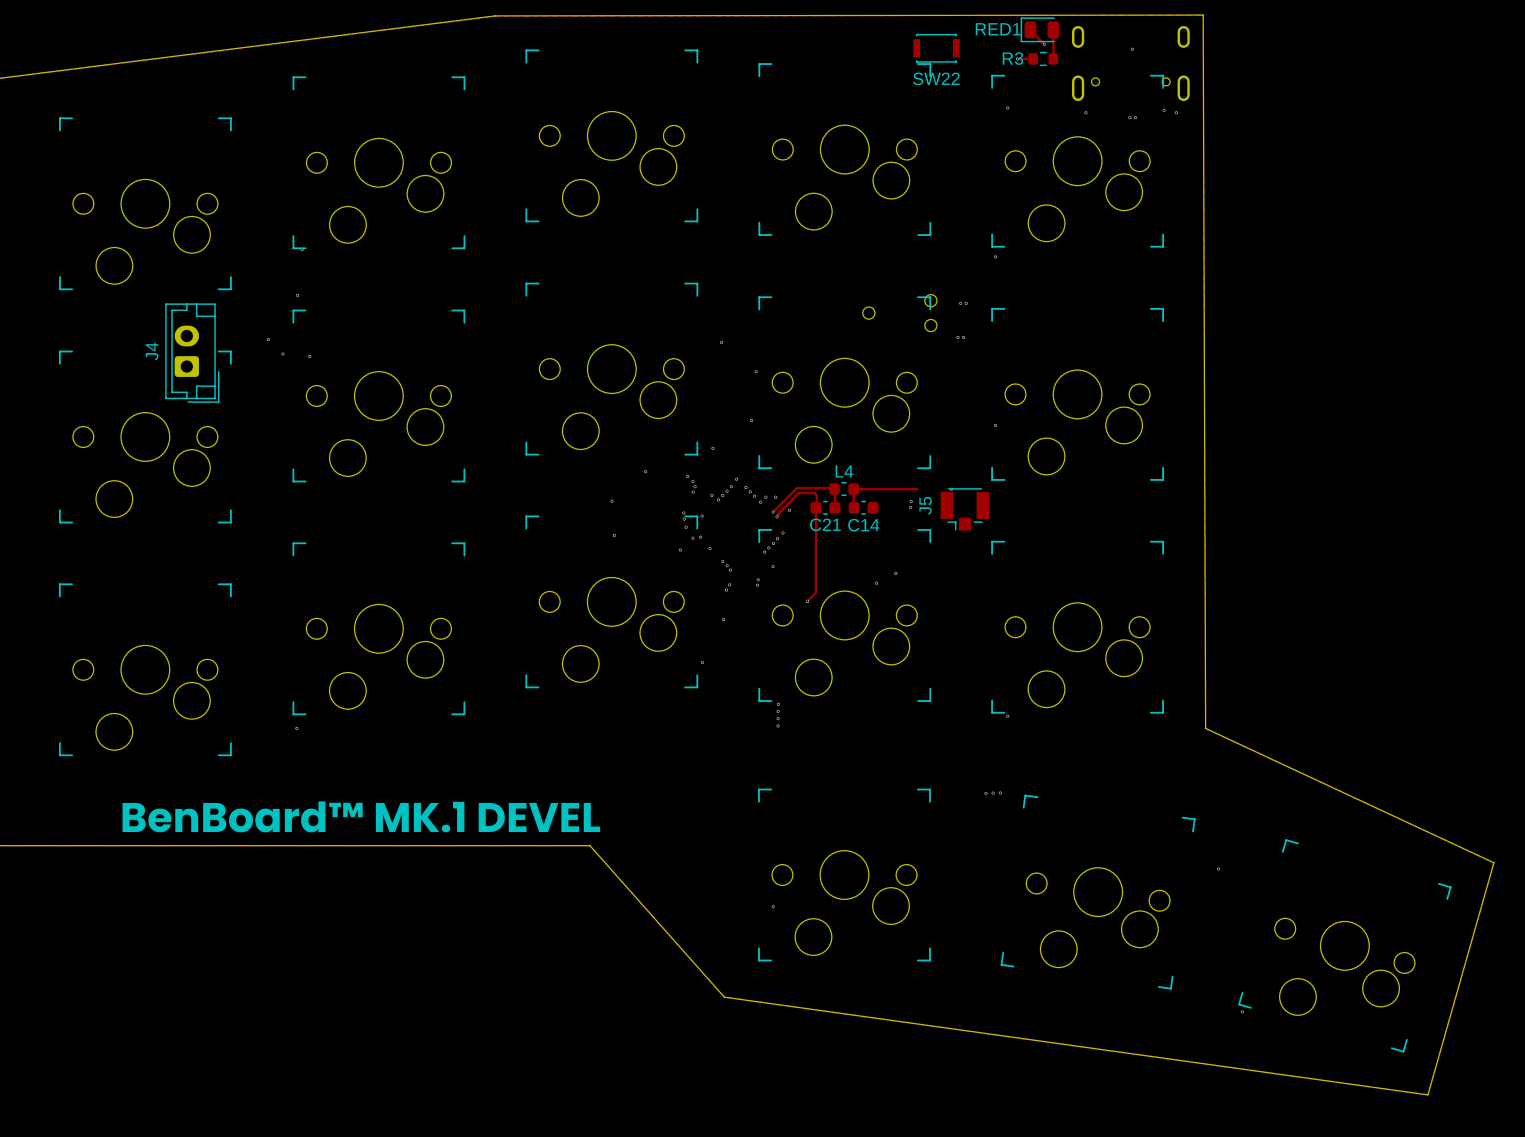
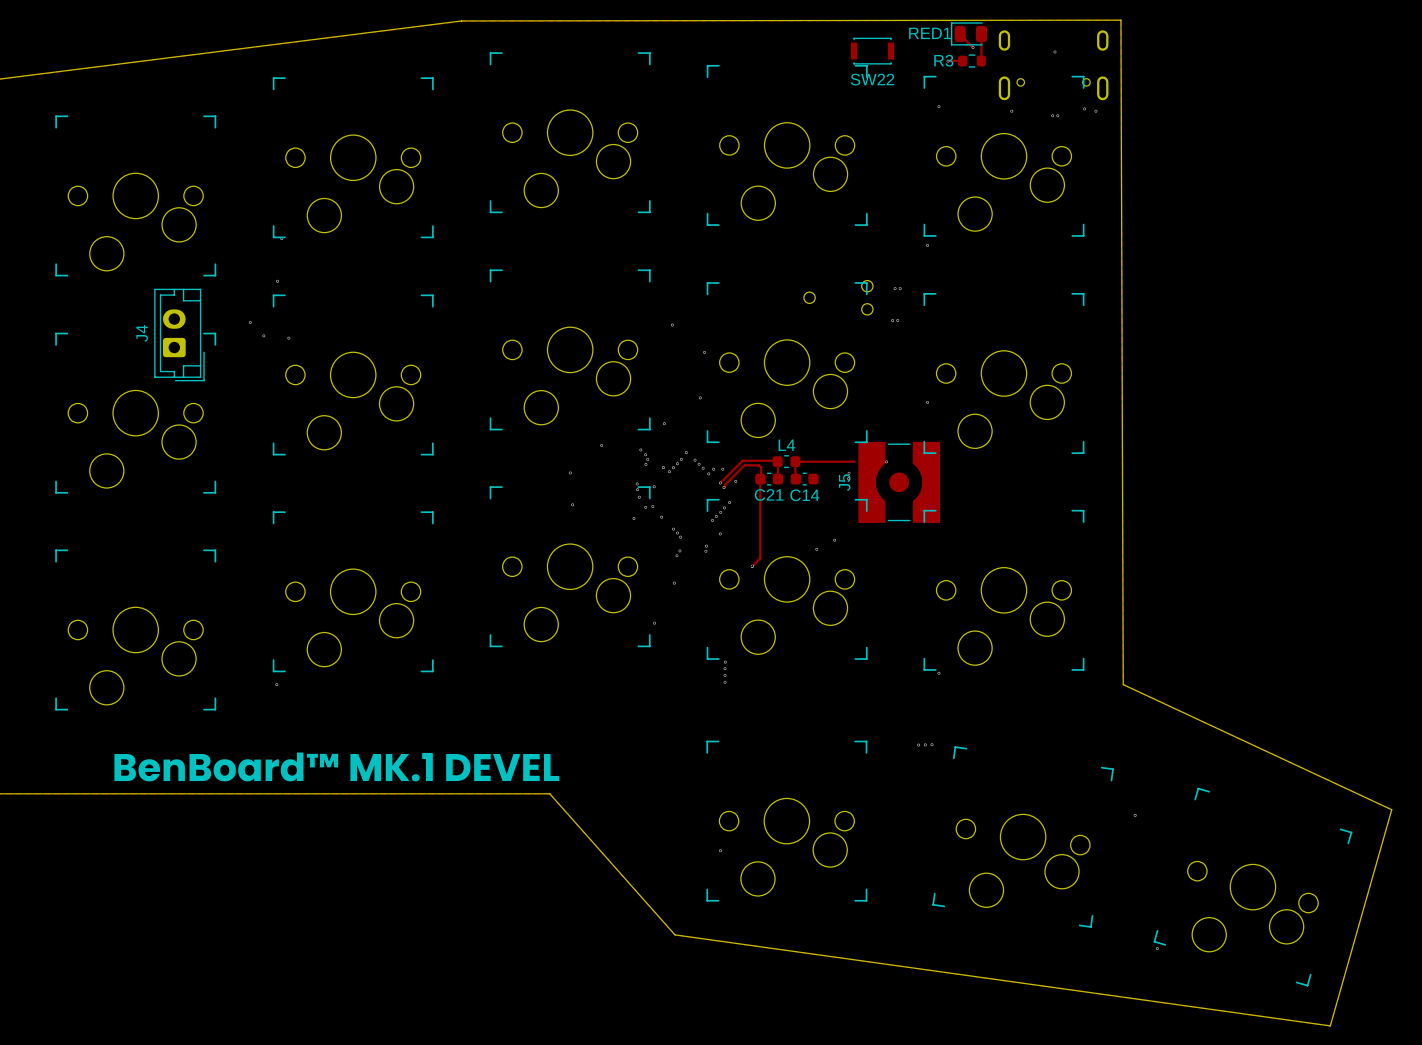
J5 footprint: [940, 488, 990, 531] -> [858, 441, 940, 523]

